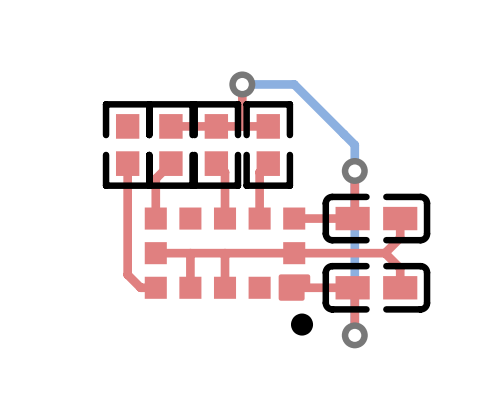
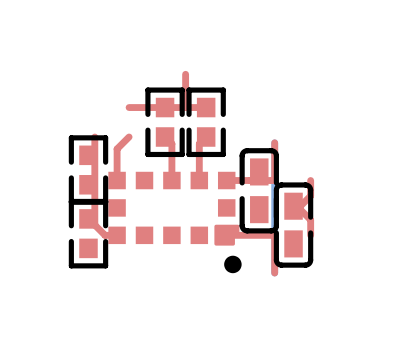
bottom track: (242, 84) (294, 84) (354, 145) (354, 170) -> none
via: (242, 84) -> none
part: (127, 145) -> none
part: (170, 145) -> none
via: (354, 170) -> none
part: none -> (88, 170)
part rotation: 0° (376, 218) -> 90° clockwise (259, 190)
top track: (155, 253) (385, 253) -> none
top track: (190, 253) (190, 287) -> none
top track: (225, 253) (225, 287) -> none
part: none -> (88, 233)
part rotation: 0° (376, 287) -> 90° clockwise (293, 225)
via: (354, 335) -> none

